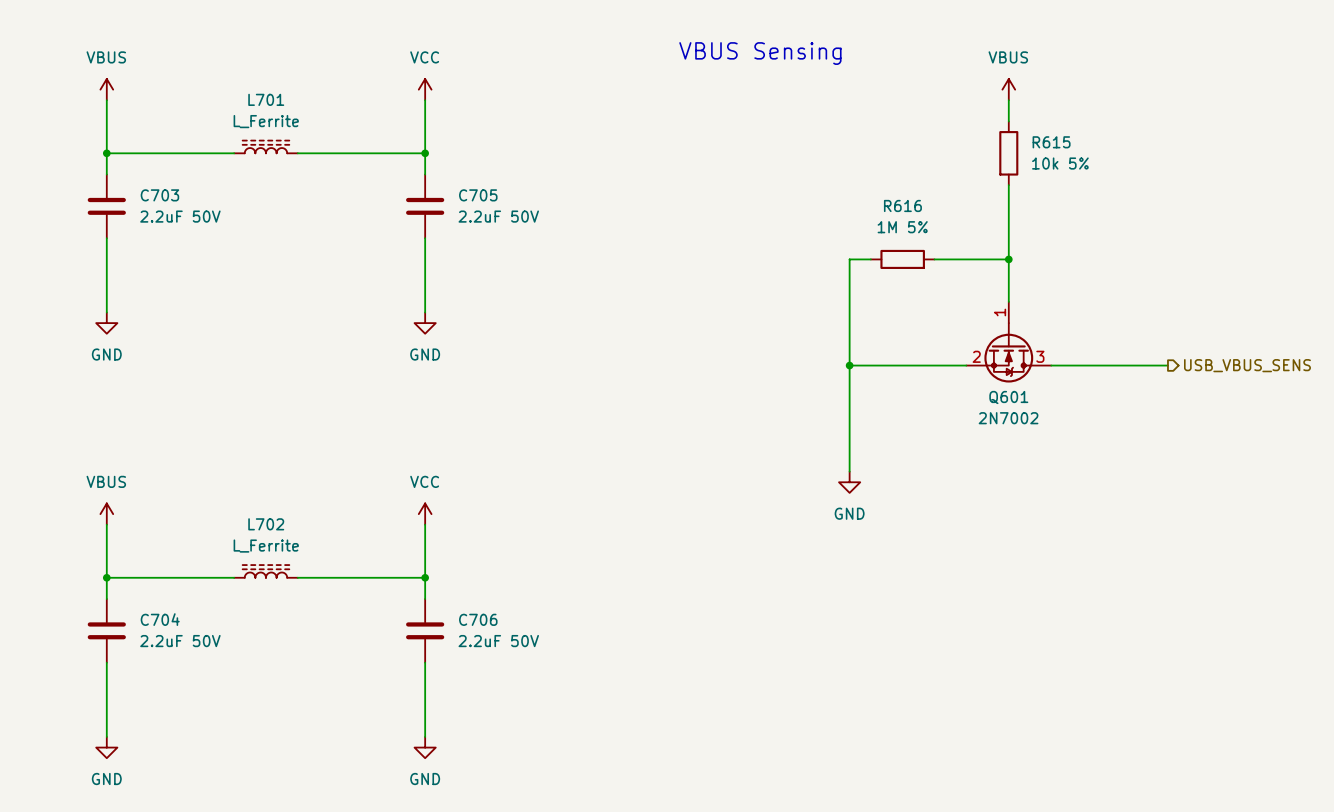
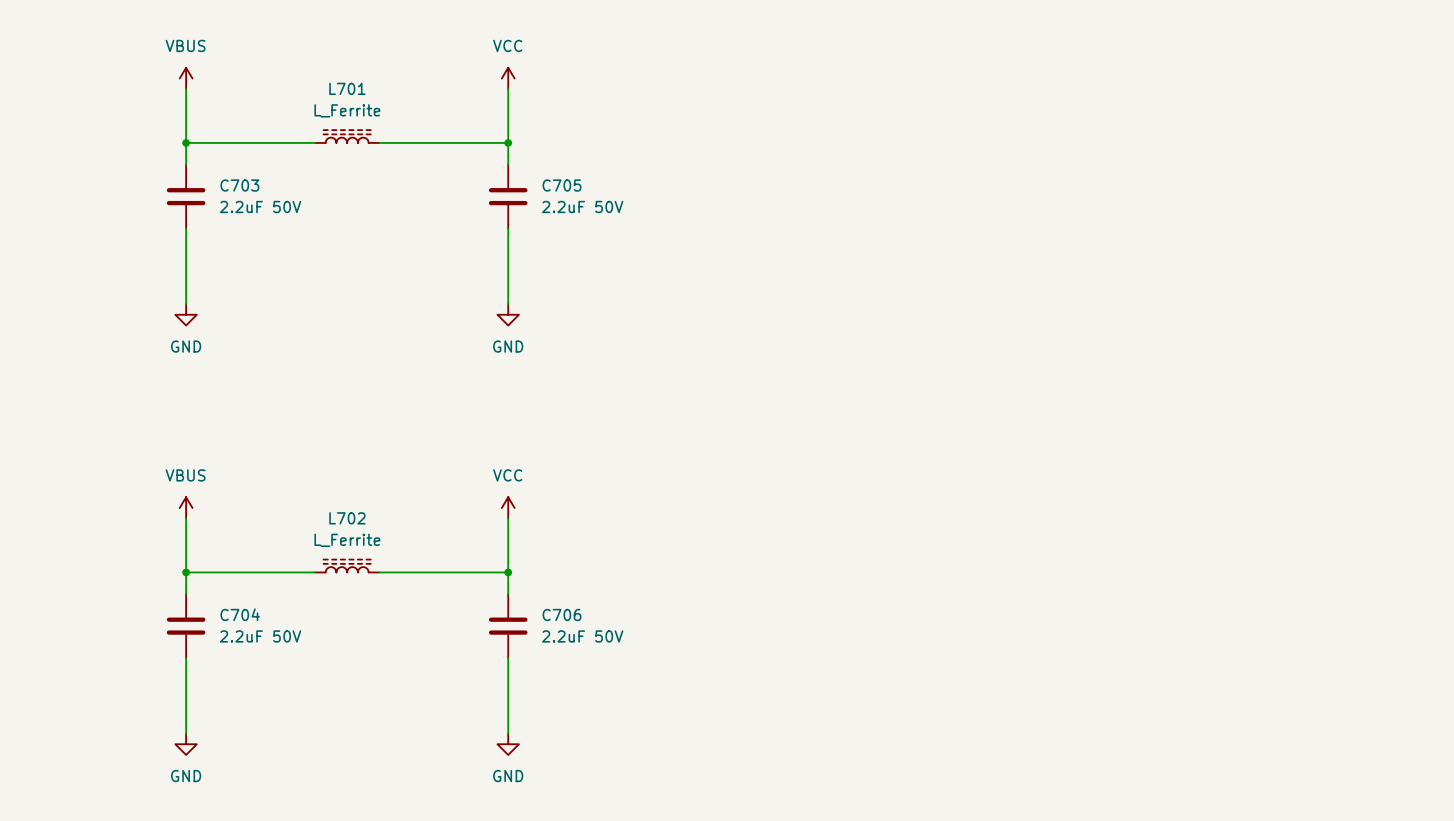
text: VBUS Sensing (760, 53) -> none
power symbol: VBUS (1008, 89) -> none
wire: (1008, 100) (1008, 121) -> none
R615: 10k 5% (1008, 153) -> none
wire: (1008, 185) (1008, 301) -> none
wire: (870, 259) (849, 259) (849, 471) -> none
R616: 1M 5% (902, 259) -> none
wire: (934, 259) (1008, 259) -> none
junction: (1008, 259) -> none
Q601: 2N7002 (1008, 342) -> none
wire: (849, 365) (966, 365) -> none
junction: (849, 365) -> none
wire: (1051, 365) (1167, 365) -> none
hierarchical label: USB_VBUS_SENS (1247, 365) -> none
power symbol: GND (849, 482) -> none

